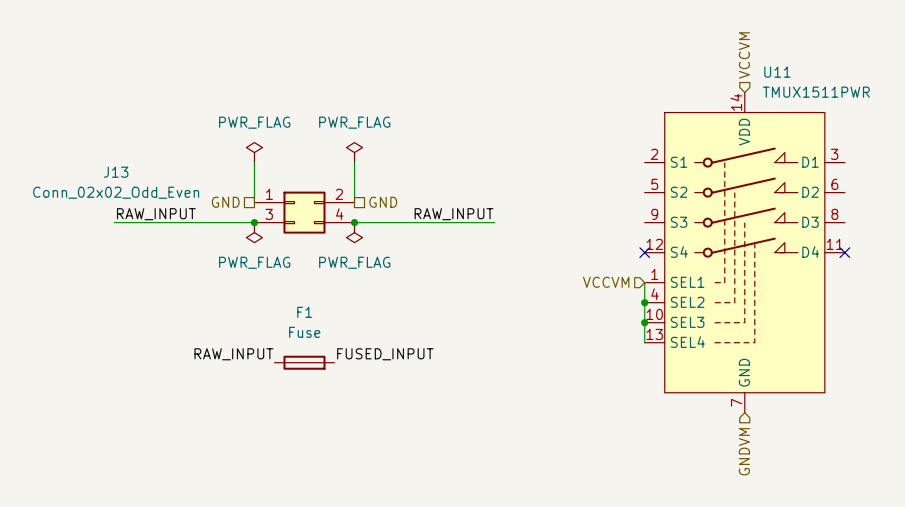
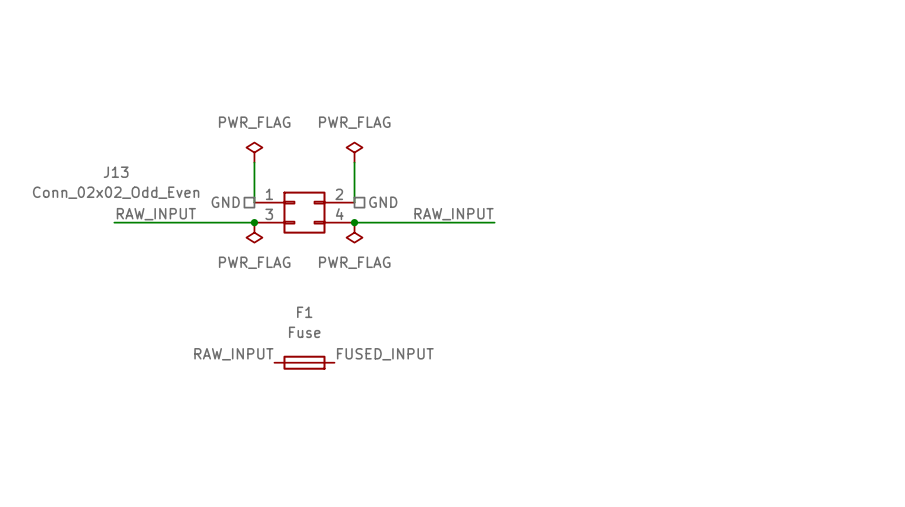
hierarchical label: VCCVM (744, 55) -> none
no-connect mark: (644, 252) -> none
U11: TMUX1511PWR (744, 252) -> none
no-connect mark: (844, 252) -> none
hierarchical label: VCCVM (606, 282) -> none
wire: (644, 282) (644, 342) -> none
junction: (644, 302) -> none
junction: (644, 322) -> none
hierarchical label: GNDVM (744, 451) -> none

